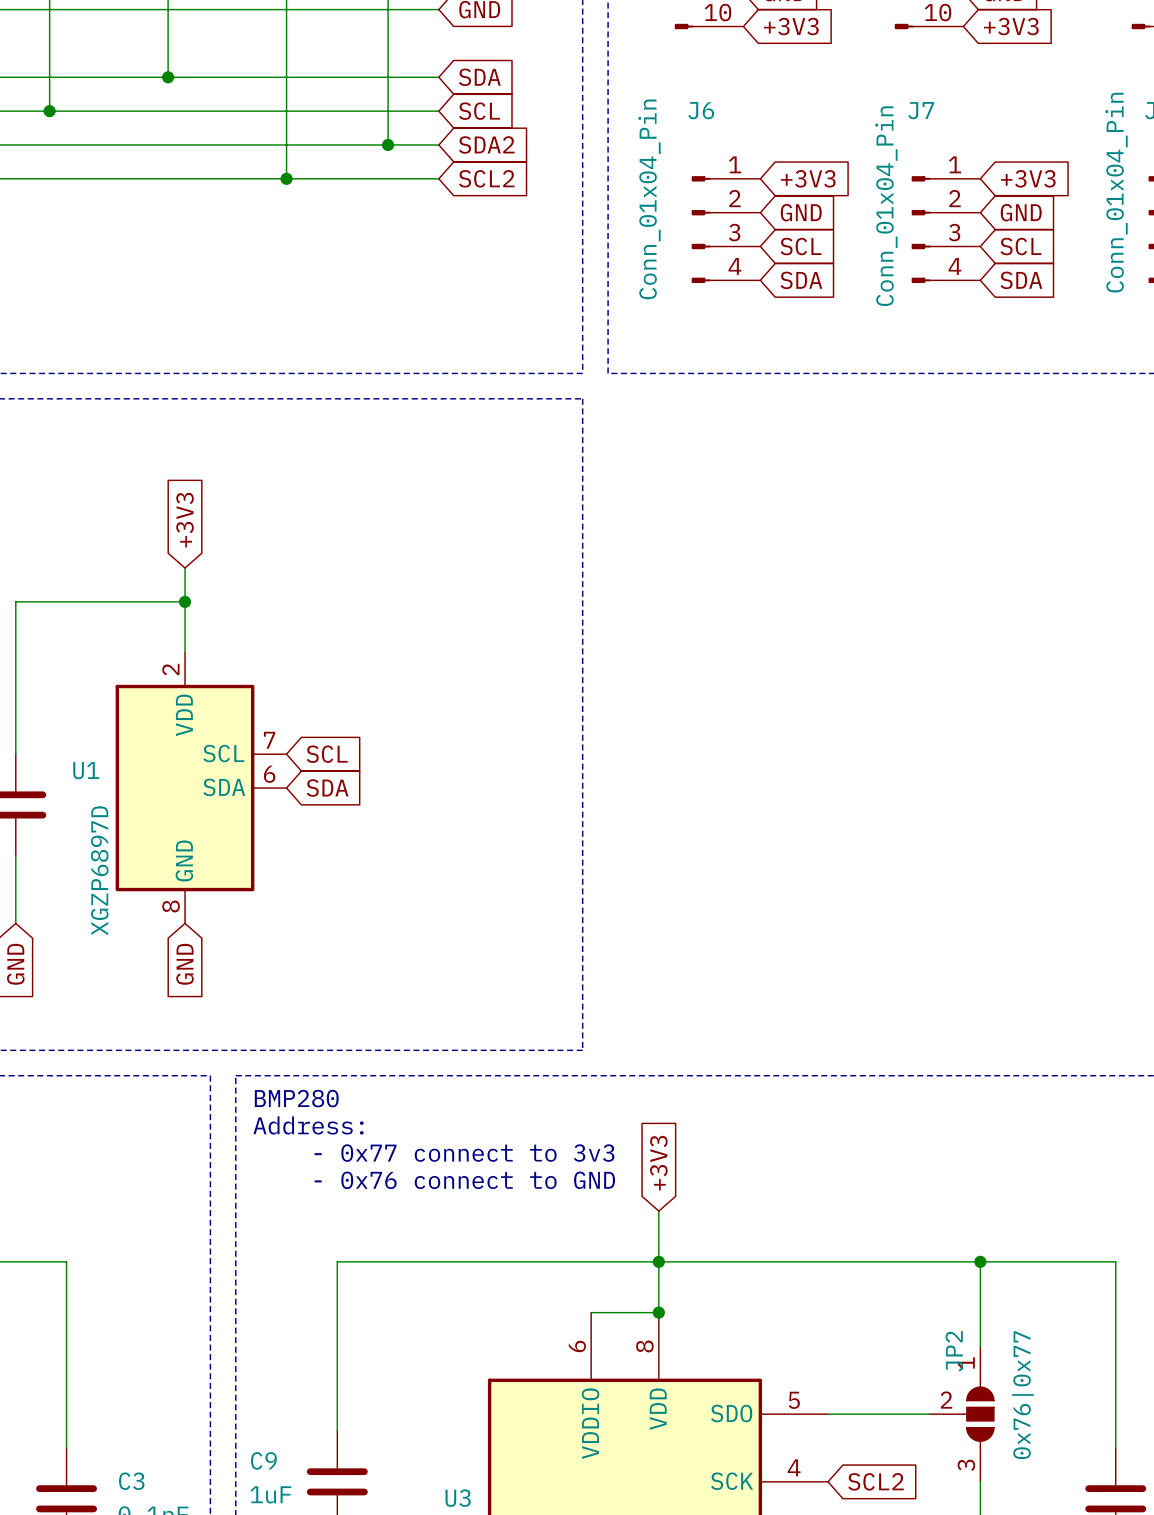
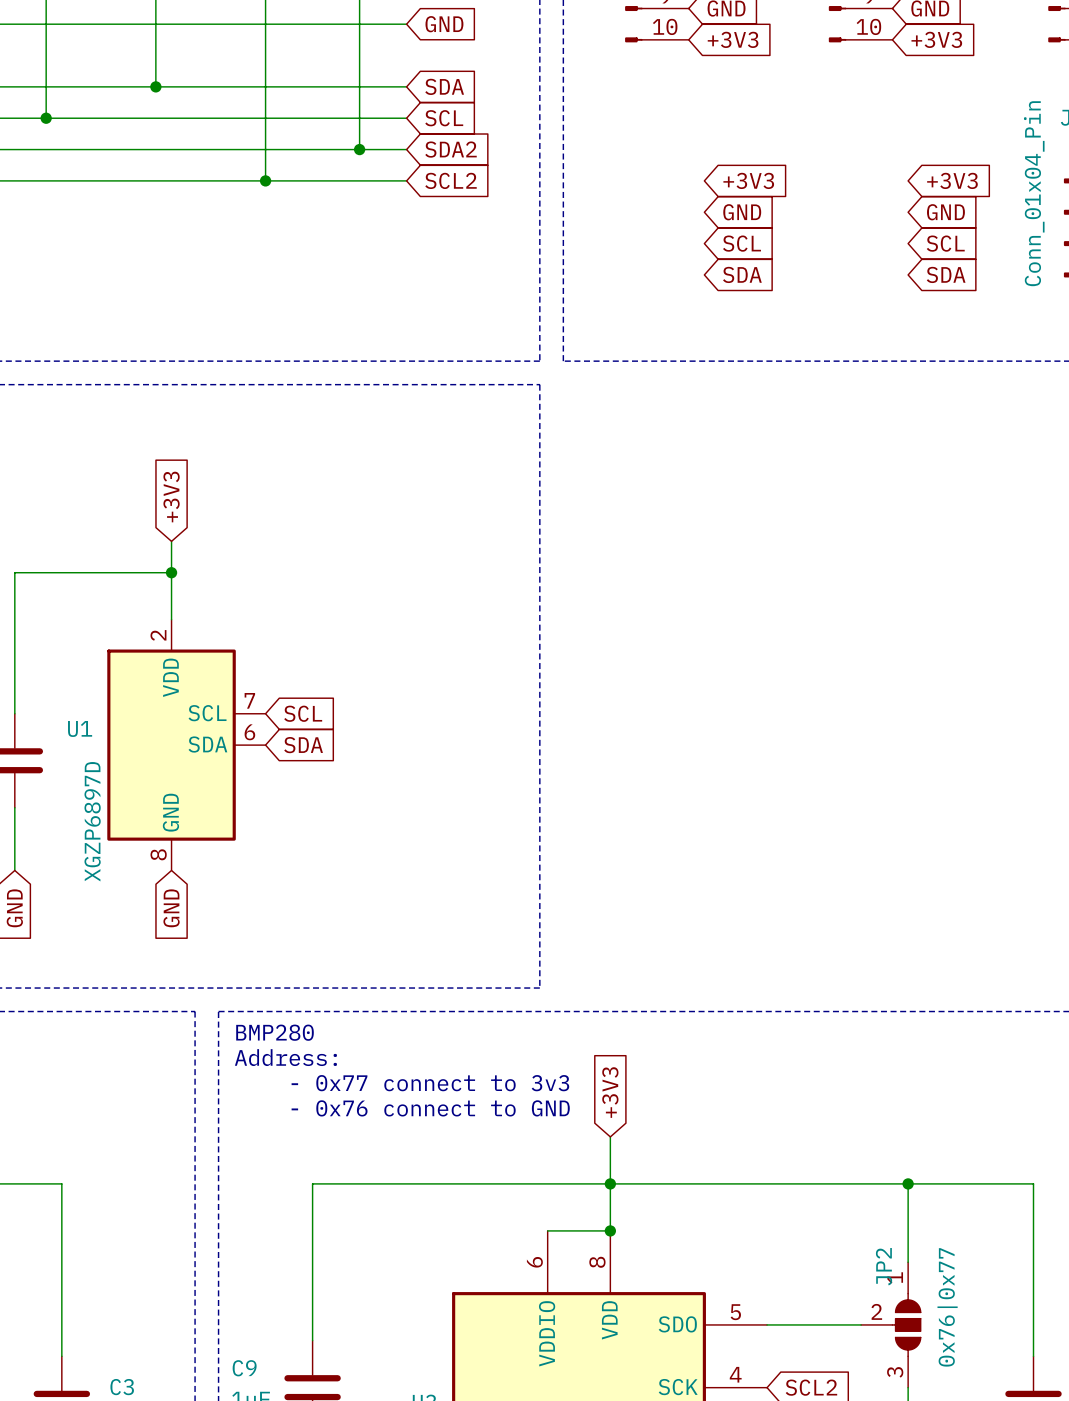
J6: Conn_01x04_Pin (726, 229) -> none
J7: Conn_01x04_Pin (946, 229) -> none

